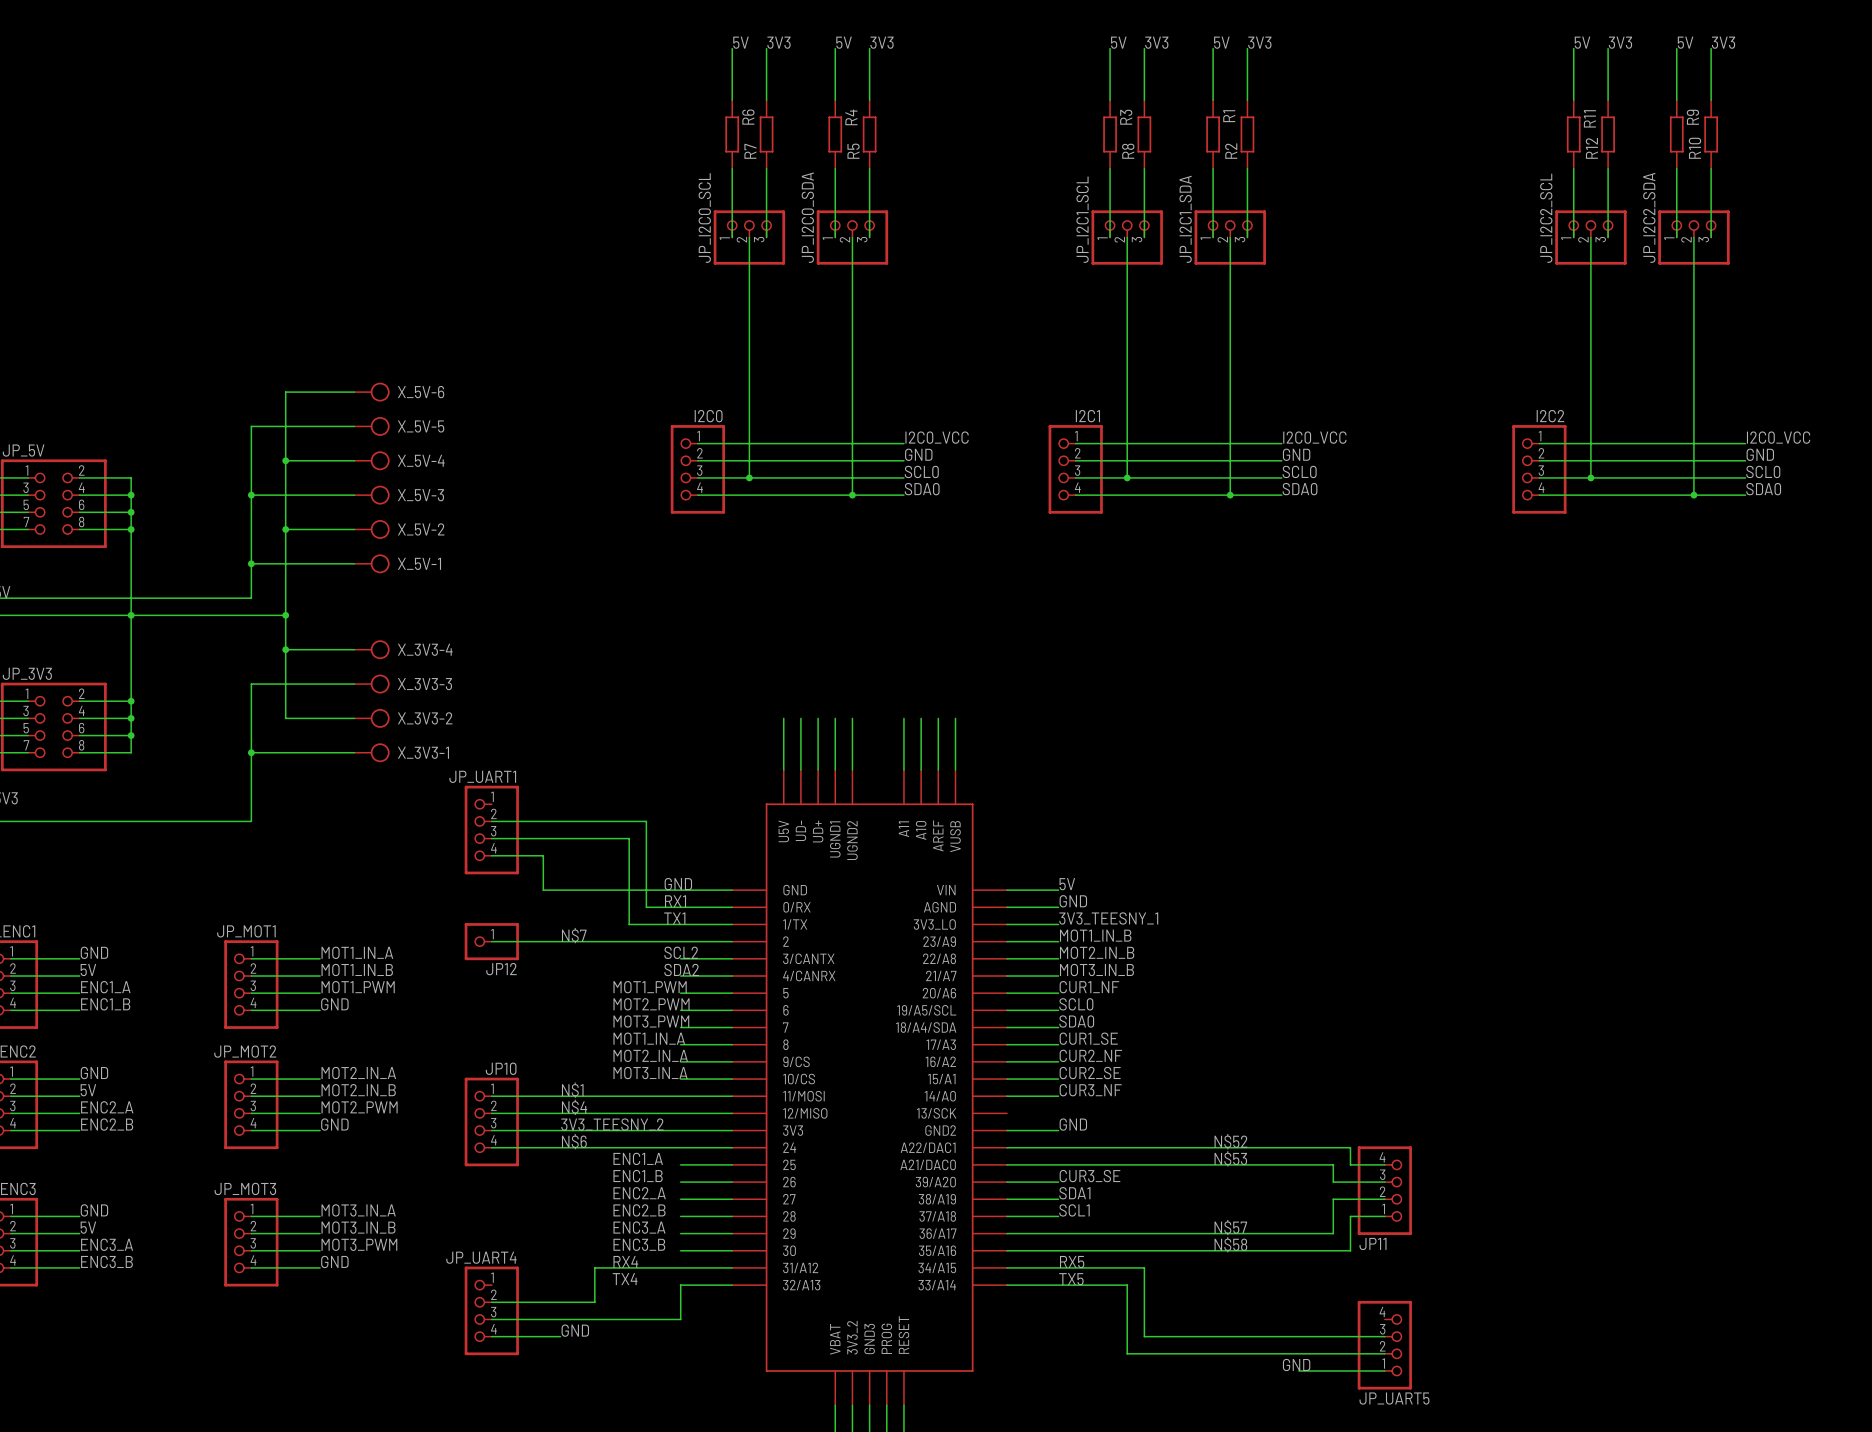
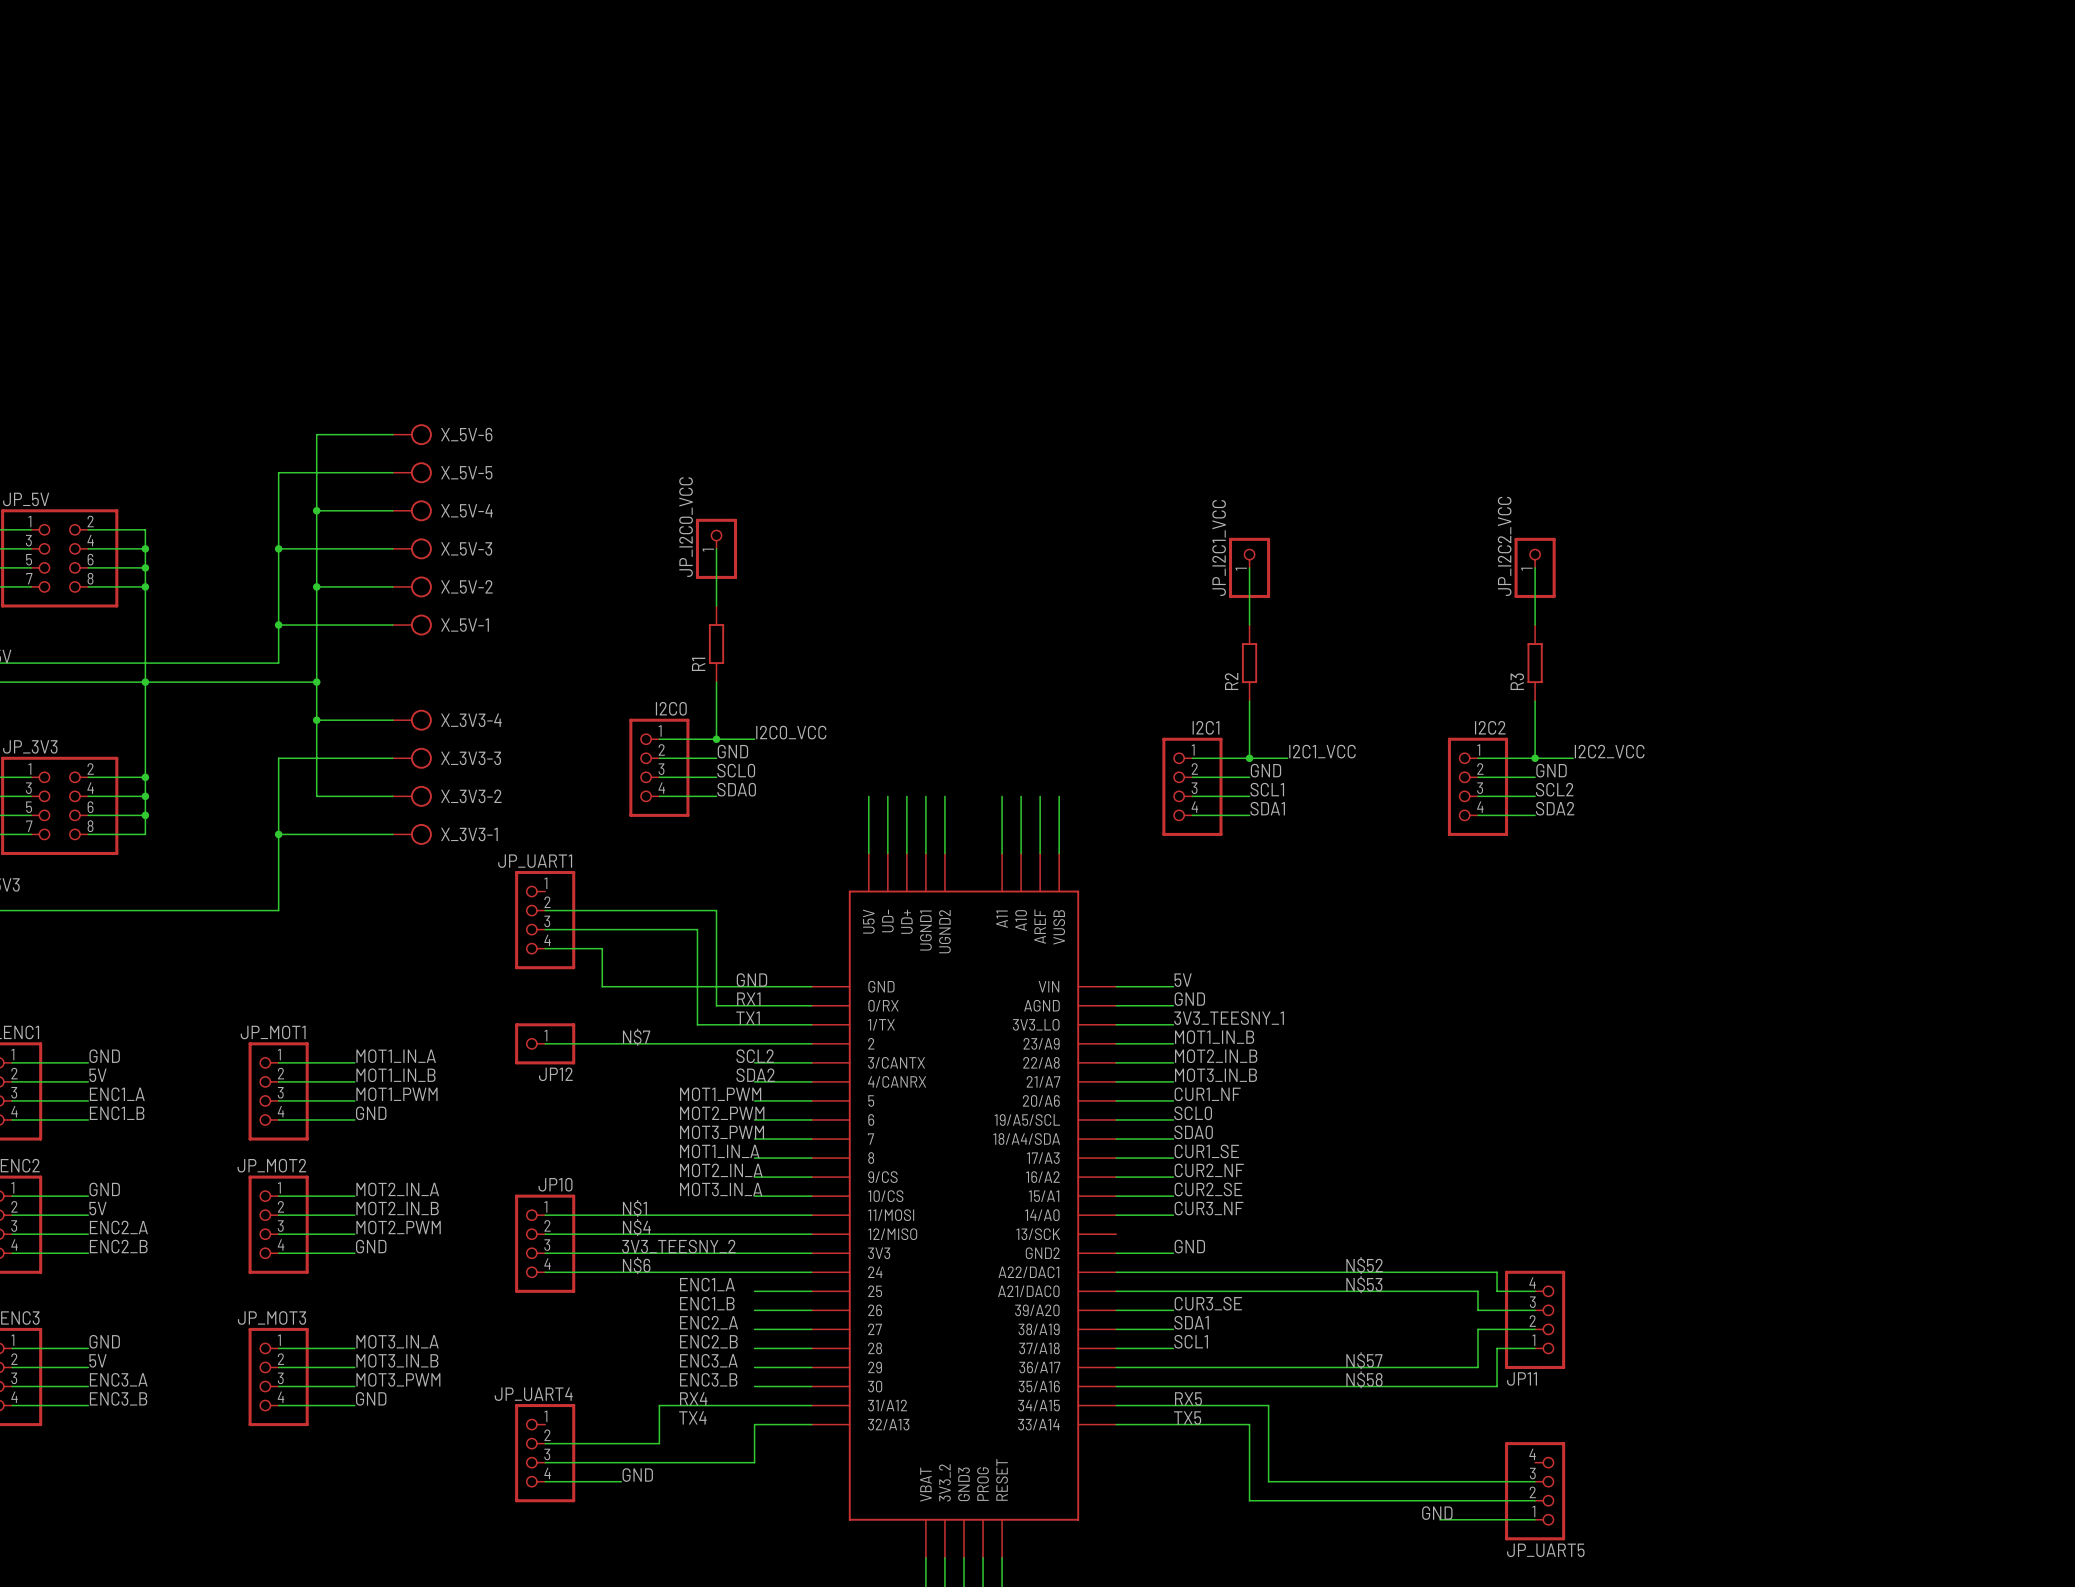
label: 5V (741, 42) -> none
label: 3V3 (778, 42) -> none
label: 5V (844, 42) -> none
label: 3V3 (882, 42) -> none
label: 5V (1118, 42) -> none
label: 3V3 (1156, 42) -> none
label: 5V (1221, 42) -> none
label: 3V3 (1259, 42) -> none
label: 5V (1582, 42) -> none
label: 3V3 (1620, 42) -> none
label: 5V (1685, 42) -> none
label: 3V3 (1723, 42) -> none
wire: (732, 48) (732, 100) -> none
wire: (766, 48) (766, 100) -> none
wire: (835, 48) (835, 100) -> none
wire: (869, 48) (869, 100) -> none
wire: (1110, 48) (1110, 100) -> none
wire: (1144, 48) (1144, 100) -> none
wire: (1213, 48) (1213, 100) -> none
wire: (1247, 48) (1247, 100) -> none
wire: (1573, 48) (1573, 100) -> none
wire: (1608, 48) (1608, 100) -> none
wire: (1676, 48) (1676, 100) -> none
wire: (1711, 48) (1711, 100) -> none
R1 name position: R1 (1229, 116) -> R1 (698, 664)
R3 name position: R3 (1126, 117) -> R3 (1517, 681)
R6: (732, 134) -> none
R7: (766, 134) -> none
R4: (835, 134) -> none
R5: (869, 134) -> none
R3 position: (1110, 134) -> (1535, 663)
R8: (1144, 134) -> none
R1 position: (1213, 134) -> (716, 644)
R2 position: (1247, 134) -> (1249, 663)
R11: (1573, 134) -> none
R12: (1608, 134) -> none
R9: (1676, 134) -> none
R10: (1711, 134) -> none
wire: (732, 168) (732, 237) -> none
wire: (766, 168) (766, 237) -> none
wire: (835, 168) (835, 237) -> none
wire: (869, 168) (869, 237) -> none
wire: (1110, 168) (1110, 237) -> none
wire: (1144, 168) (1144, 237) -> none
wire: (1213, 168) (1213, 237) -> none
wire: (1247, 168) (1247, 237) -> none
wire: (1573, 168) (1573, 237) -> none
wire: (1608, 168) (1608, 237) -> none
wire: (1676, 168) (1676, 237) -> none
wire: (1711, 168) (1711, 237) -> none
wire: (749, 237) (749, 477) -> none
JP_I2C0_SCL: (749, 237) -> none
wire: (852, 237) (852, 495) -> none
JP_I2C0_SDA: (852, 237) -> none
wire: (1127, 237) (1127, 477) -> none
JP_I2C1_SCL: (1127, 237) -> none
wire: (1230, 237) (1230, 495) -> none
JP_I2C1_SDA: (1230, 237) -> none
wire: (1590, 237) (1590, 477) -> none
JP_I2C2_SCL: (1590, 237) -> none
wire: (1693, 237) (1693, 495) -> none
JP_I2C2_SDA: (1693, 237) -> none
label: I2C0_VCC (937, 437) -> none
label: I2C0_VCC (1314, 437) -> none
label: I2C0_VCC (1778, 437) -> none
wire: (697, 443) (903, 443) -> none
wire: (1075, 443) (1281, 443) -> none
wire: (1539, 443) (1745, 443) -> none
label: GND (918, 454) -> none
label: GND (1296, 454) -> none
label: GND (1760, 454) -> none
wire: (697, 460) (903, 460) -> none
wire: (1075, 460) (1281, 460) -> none
wire: (1539, 460) (1745, 460) -> none
I2C0 position: (697, 469) -> (659, 767)
I2C1 position: (1075, 469) -> (1192, 786)
I2C2 position: (1539, 469) -> (1478, 786)
label: SCL0 (921, 471) -> none
label: SCL0 (1299, 471) -> none
label: SCL0 (1763, 471) -> none
wire: (697, 477) (903, 477) -> none
junction: (749, 477) -> none
wire: (1075, 477) (1281, 477) -> none
junction: (1127, 477) -> none
wire: (1539, 477) (1745, 477) -> none
junction: (1590, 477) -> none
label: SDA0 (922, 489) -> none
label: SDA0 (1299, 489) -> none
label: SDA0 (1763, 489) -> none
wire: none -> (716, 548) (716, 605)
JP_I2C0_VCC: none -> (716, 548)
wire: (697, 495) (903, 495) -> none
junction: (852, 495) -> none
wire: (1075, 495) (1281, 495) -> none
junction: (1230, 495) -> none
wire: (1539, 495) (1745, 495) -> none
junction: (1693, 495) -> none
wire: none -> (1249, 567) (1249, 625)
JP_I2C1_VCC: none -> (1249, 567)
wire: none -> (1535, 567) (1535, 625)
JP_I2C2_VCC: none -> (1535, 567)
wire: none -> (716, 682) (716, 739)
wire: none -> (1249, 701) (1249, 758)
wire: none -> (1535, 701) (1535, 758)
label: none -> I2C0_VCC (791, 732)
wire: none -> (659, 739) (754, 739)
junction: none -> (716, 739)
label: none -> GND (732, 751)
label: none -> I2C1_VCC (1322, 751)
label: none -> I2C2_VCC (1609, 751)
wire: none -> (659, 758) (716, 758)
wire: none -> (1192, 758) (1287, 758)
junction: none -> (1249, 758)
wire: none -> (1478, 758) (1573, 758)
junction: none -> (1535, 758)
label: none -> SCL0 (736, 770)
label: none -> GND (1265, 770)
label: none -> GND (1551, 770)
wire: none -> (659, 777) (716, 777)
wire: none -> (1192, 777) (1249, 777)
wire: none -> (1478, 777) (1535, 777)
label: none -> SDA0 (736, 789)
label: none -> SCL1 (1267, 789)
label: none -> SCL2 (1554, 789)
wire: none -> (659, 796) (716, 796)
wire: none -> (1192, 796) (1249, 796)
wire: none -> (1478, 796) (1535, 796)
label: none -> SDA1 (1267, 808)
label: none -> SDA2 (1555, 808)
wire: none -> (1192, 815) (1249, 815)
wire: none -> (1478, 815) (1535, 815)

